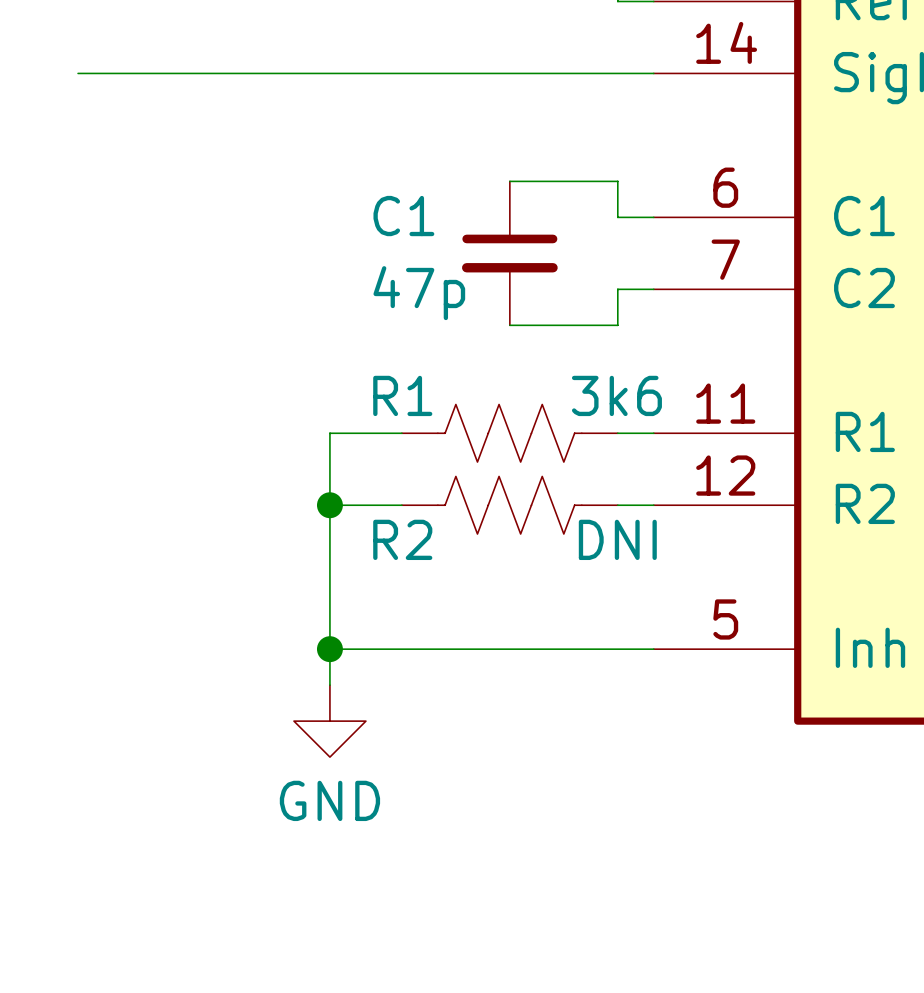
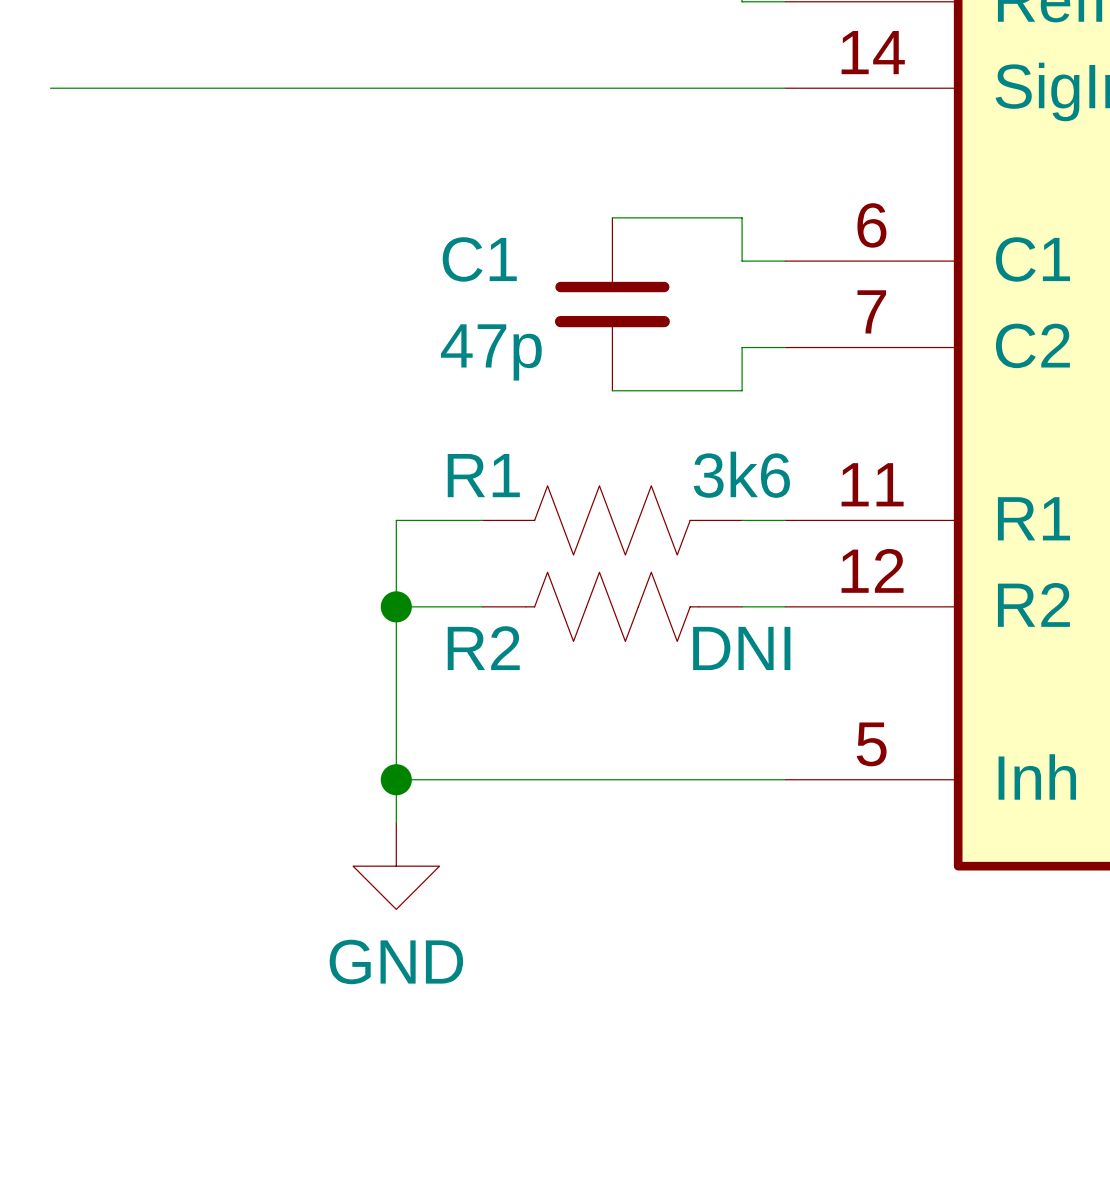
wire: none -> (50, 88) (93, 88)

